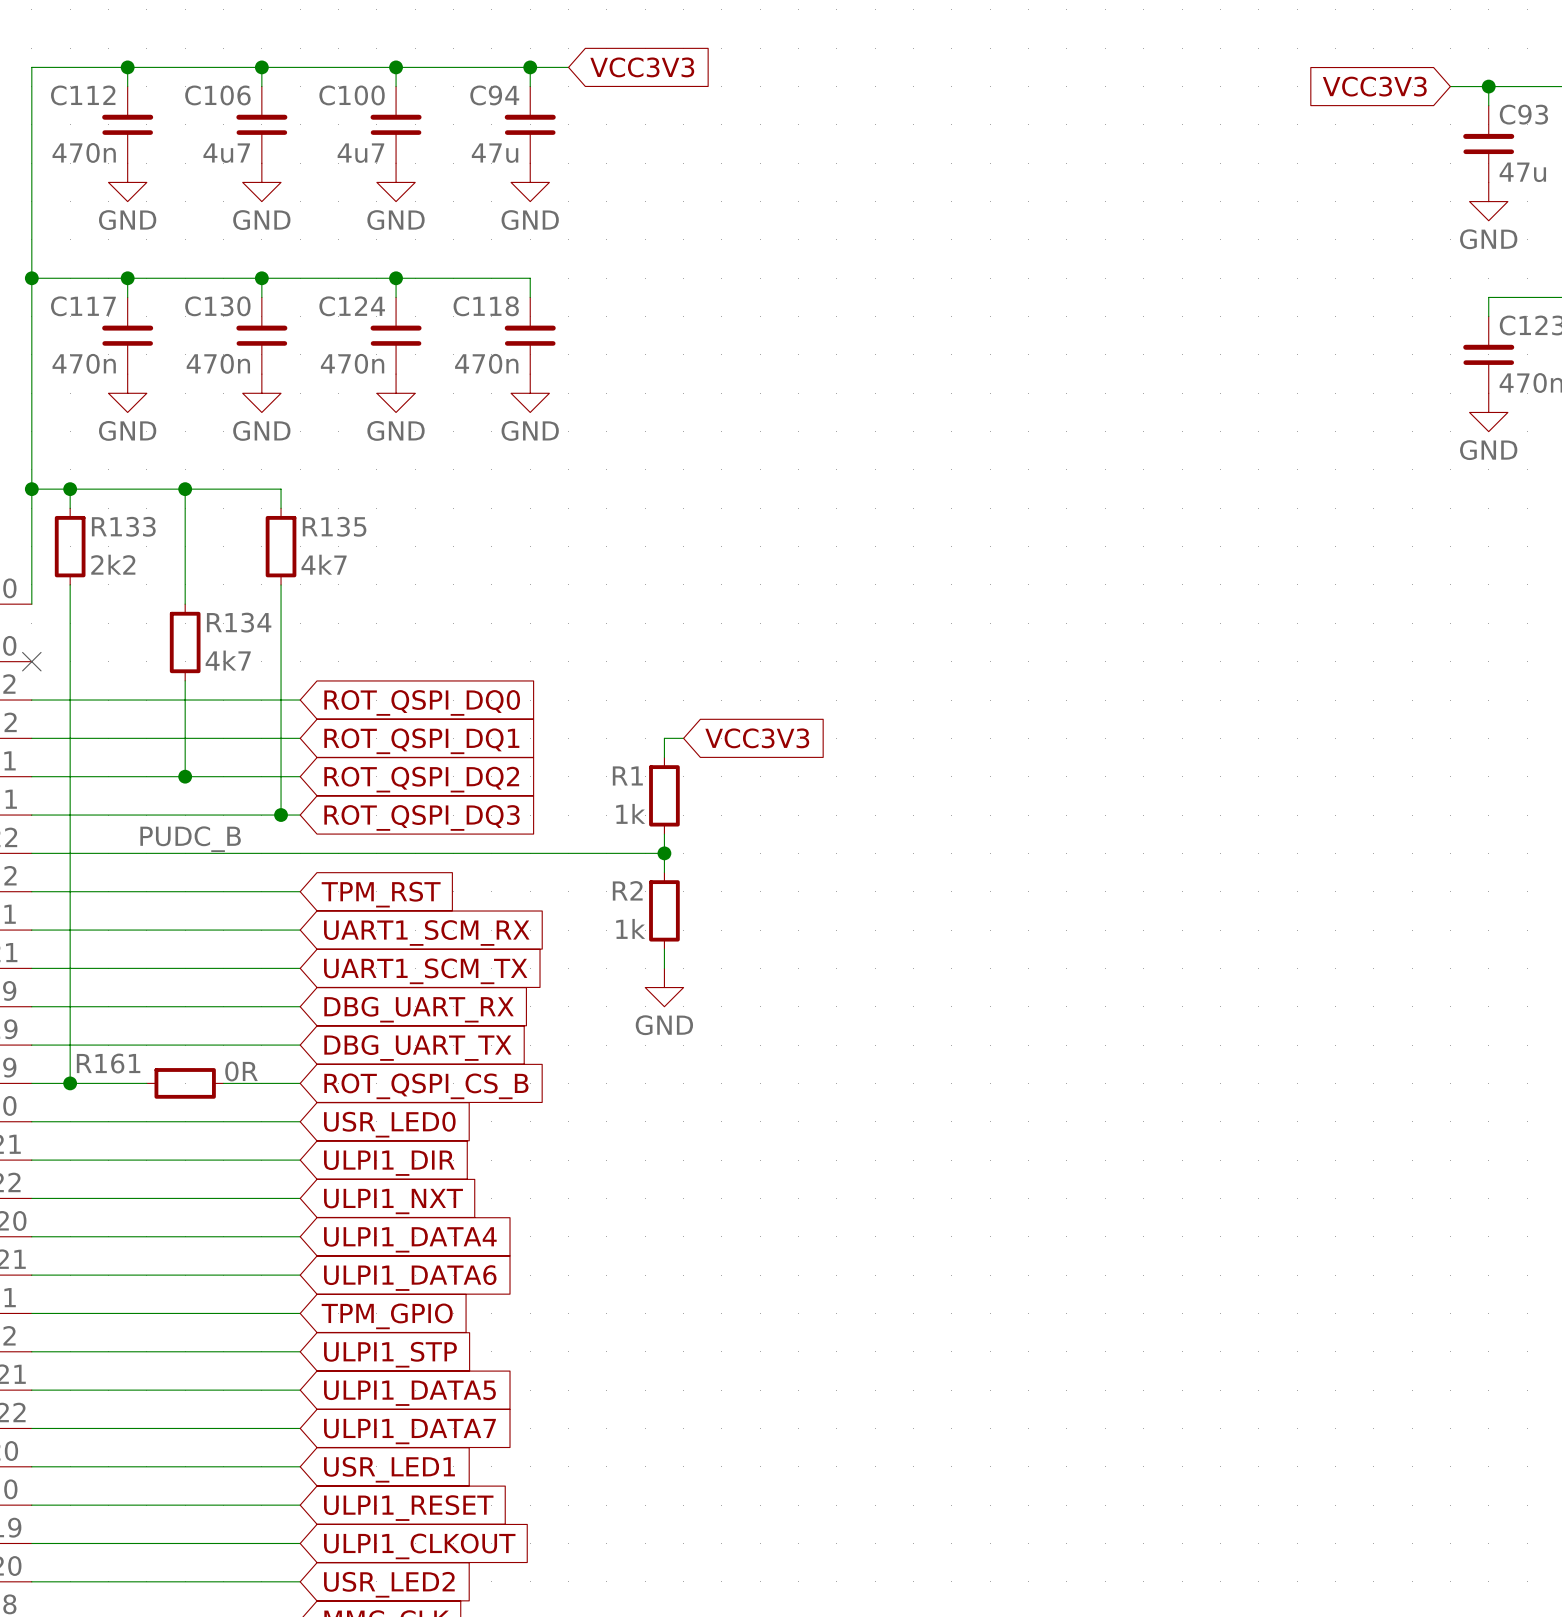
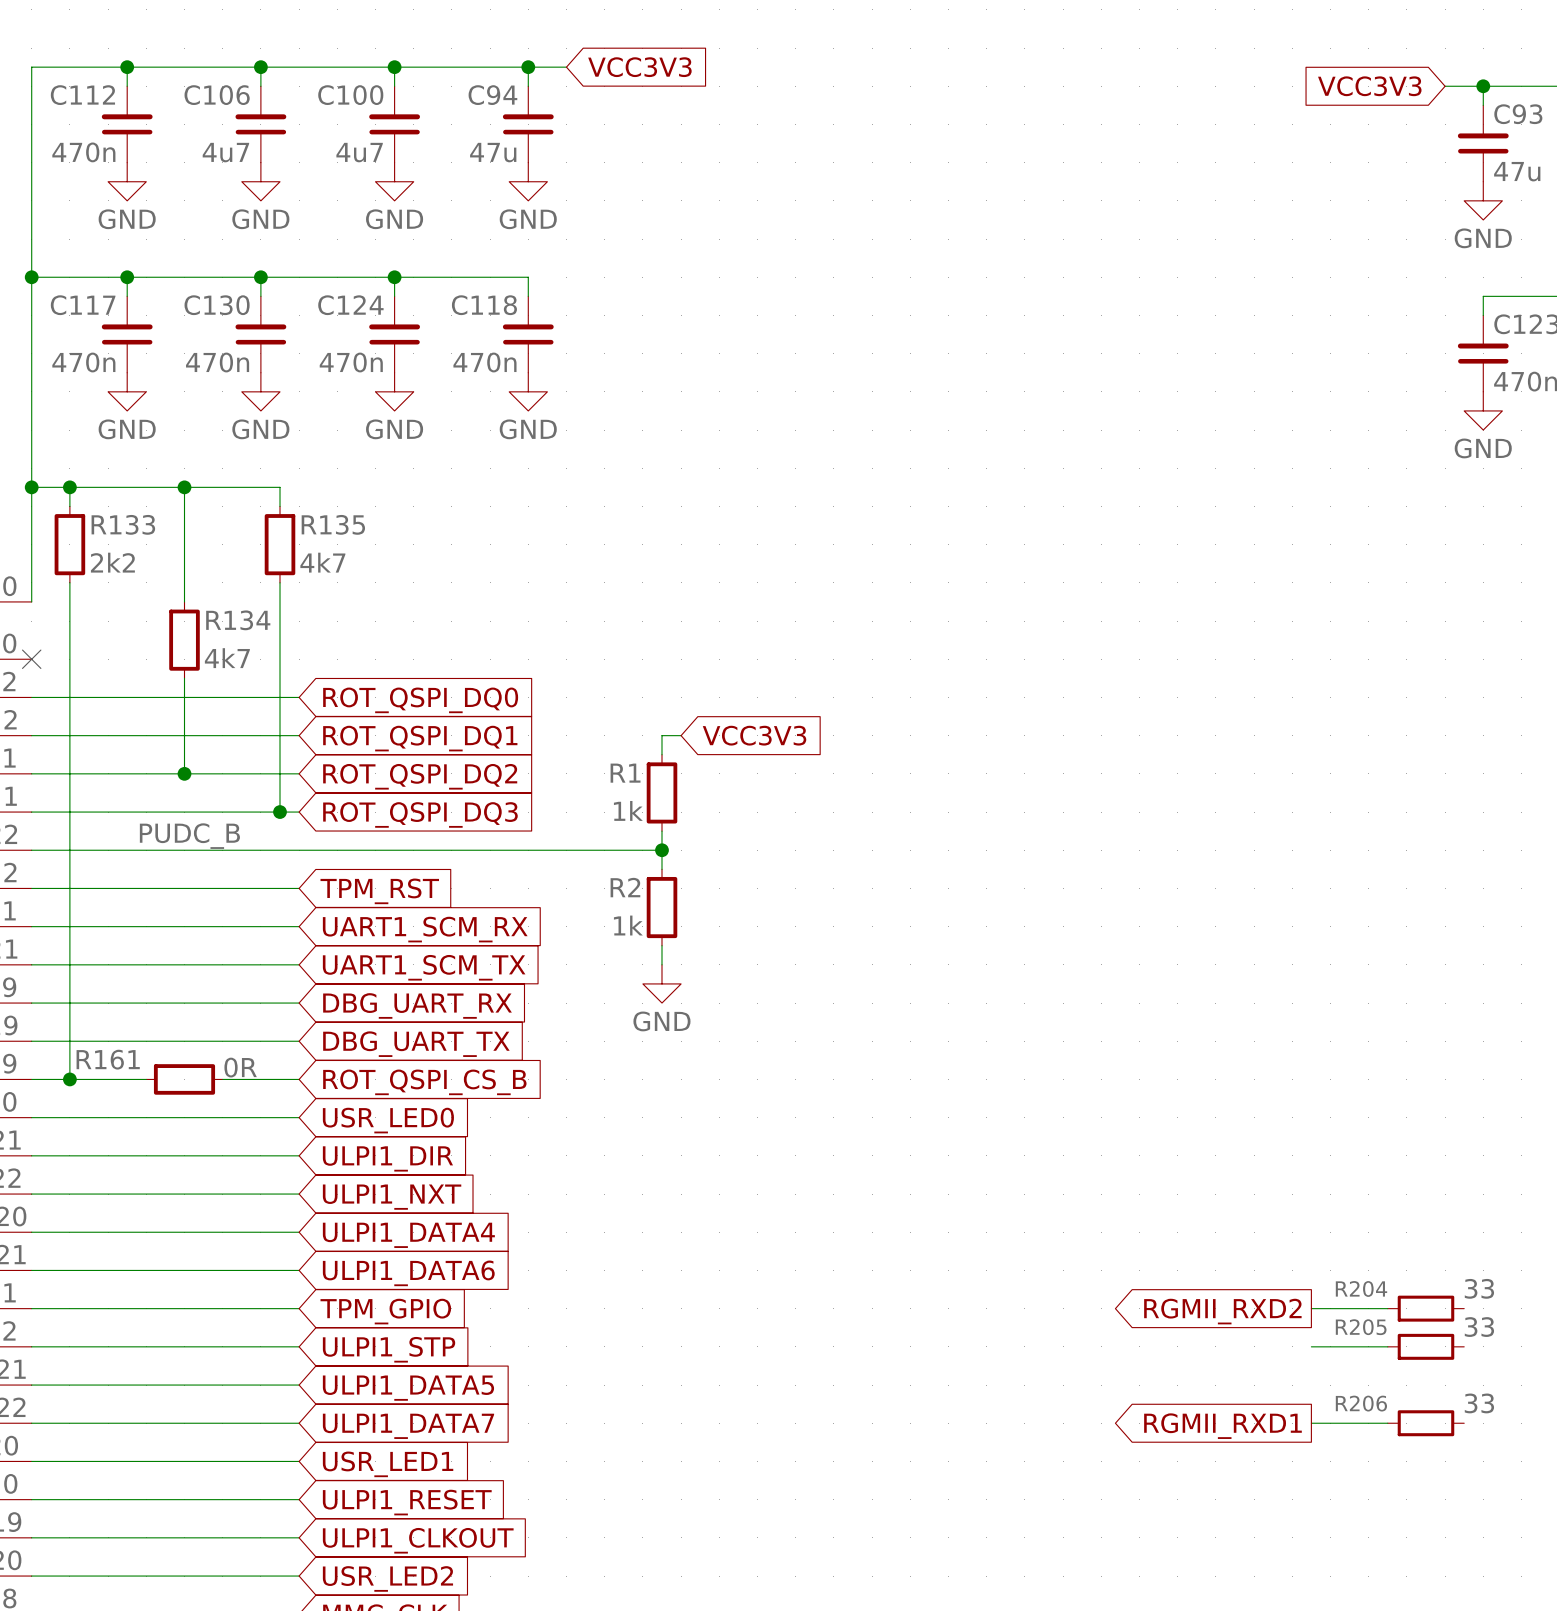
wire: none -> (1311, 1308) (1387, 1308)
R204: none -> 33 (1425, 1308)
global label: none -> RGMII_RXD2 (1222, 1311)
wire: none -> (1311, 1346) (1387, 1346)
R205: none -> 33 (1425, 1346)
wire: none -> (1311, 1423) (1387, 1423)
R206: none -> 33 (1425, 1423)
global label: none -> RGMII_RXD1 (1222, 1426)

